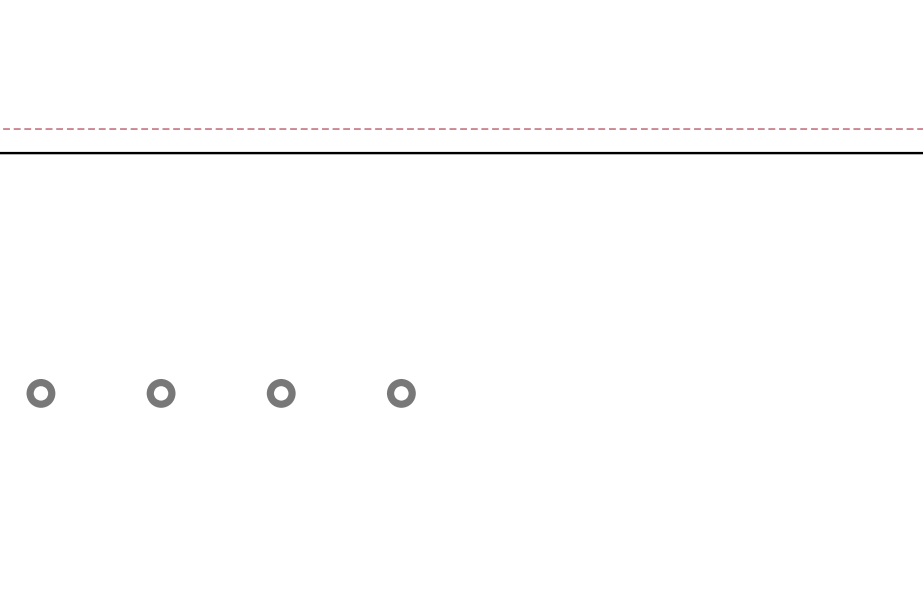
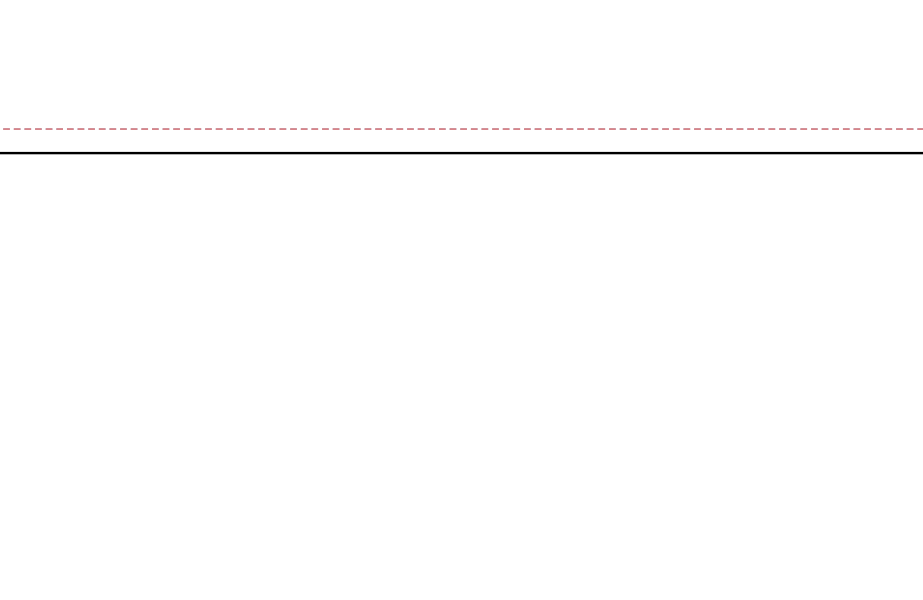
via: (40, 393) -> none
via: (161, 393) -> none
via: (281, 393) -> none
via: (401, 393) -> none

